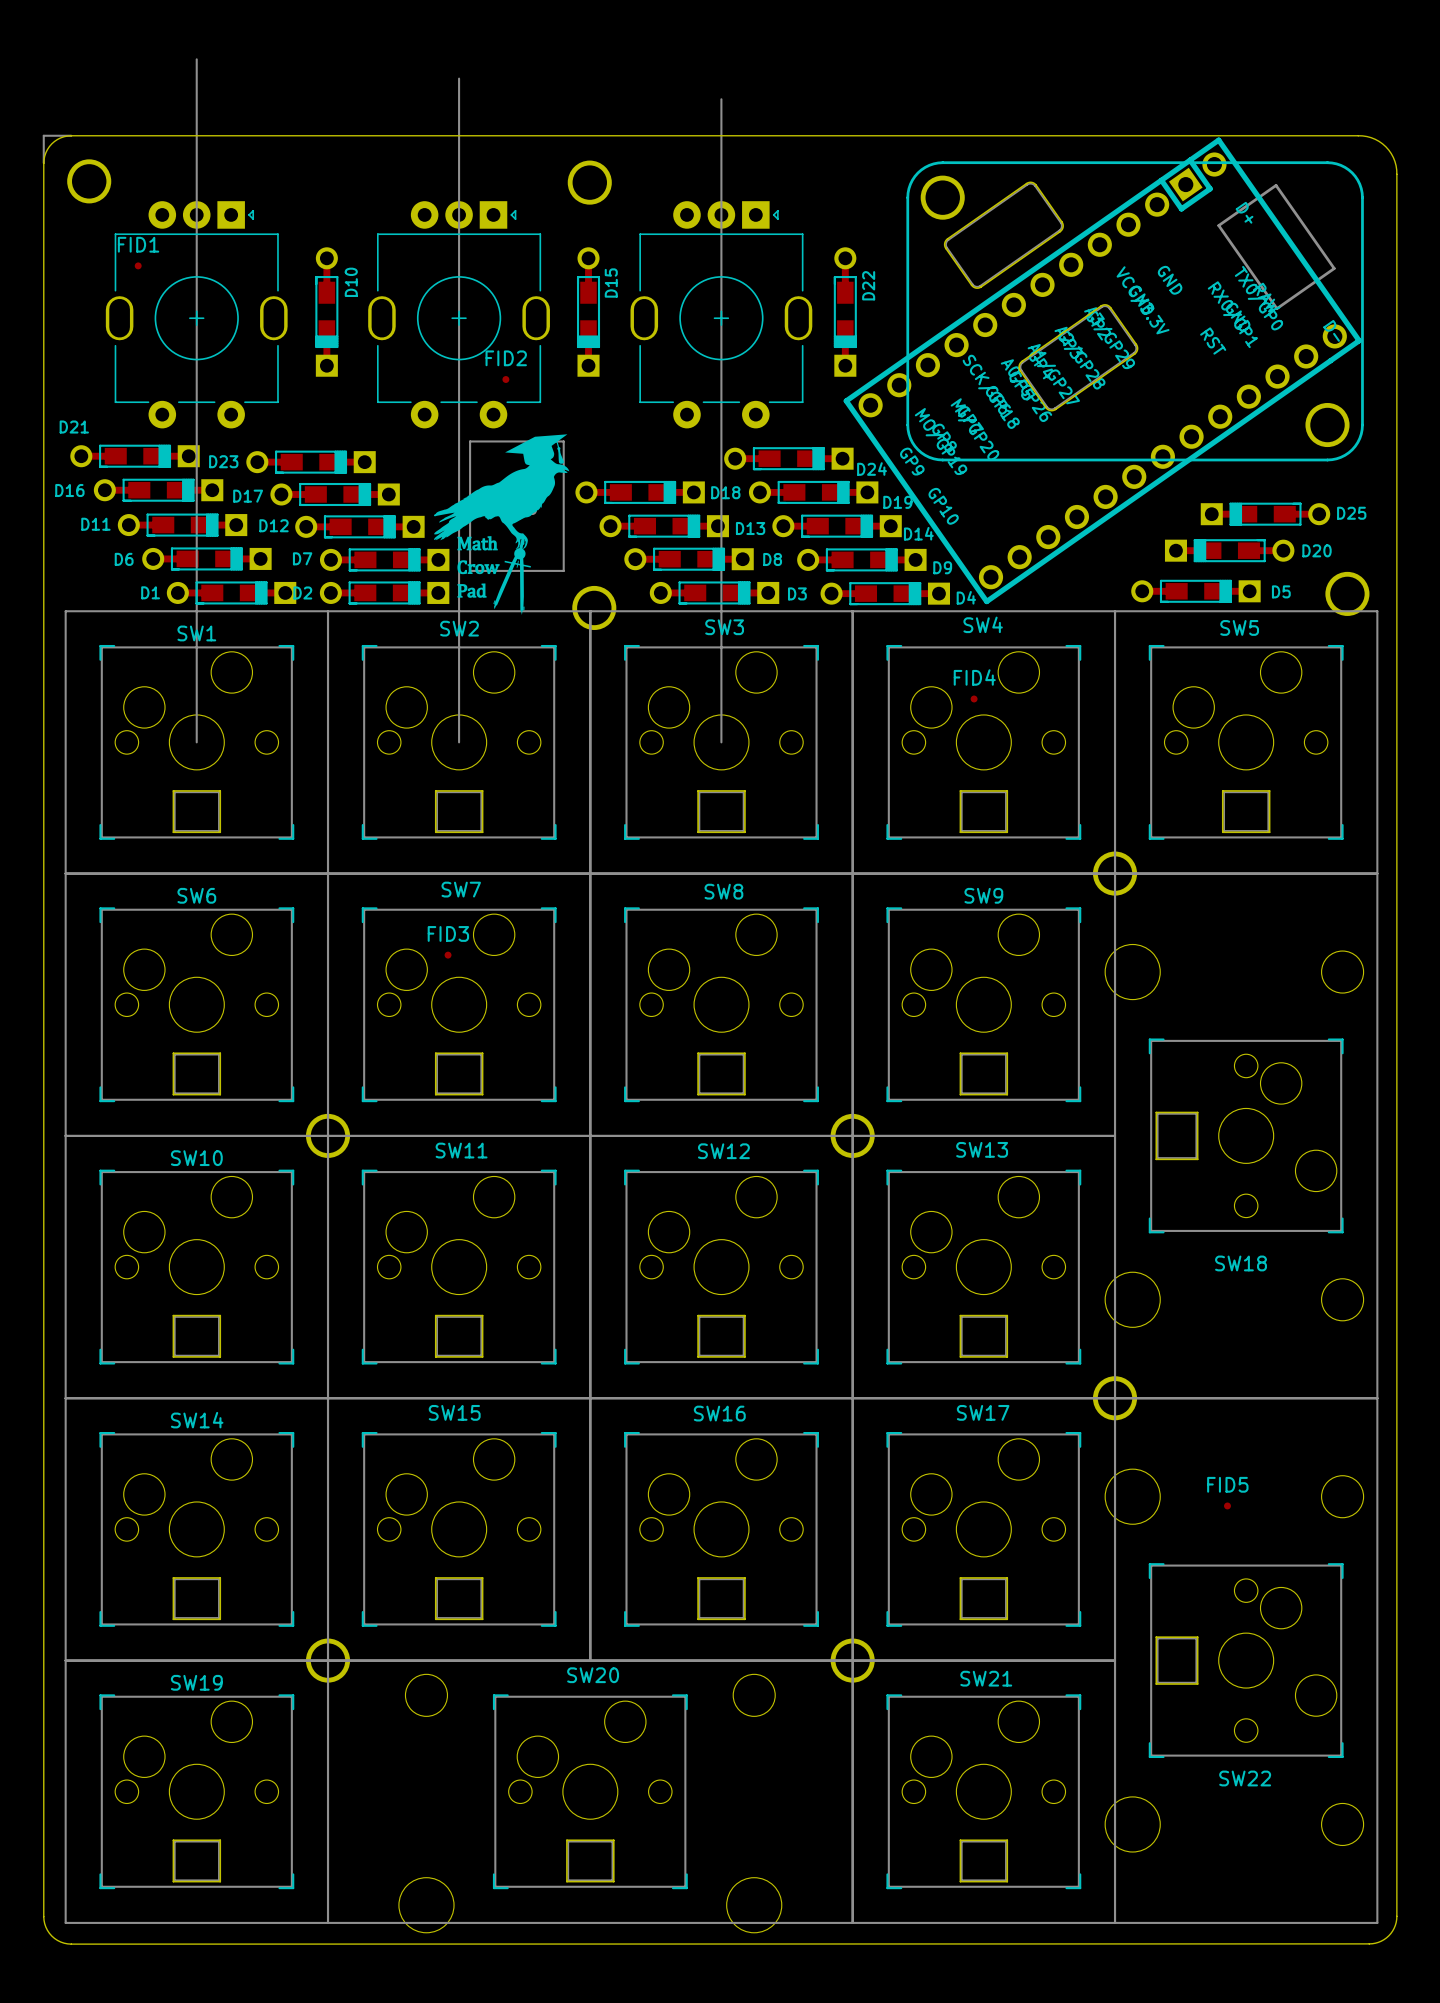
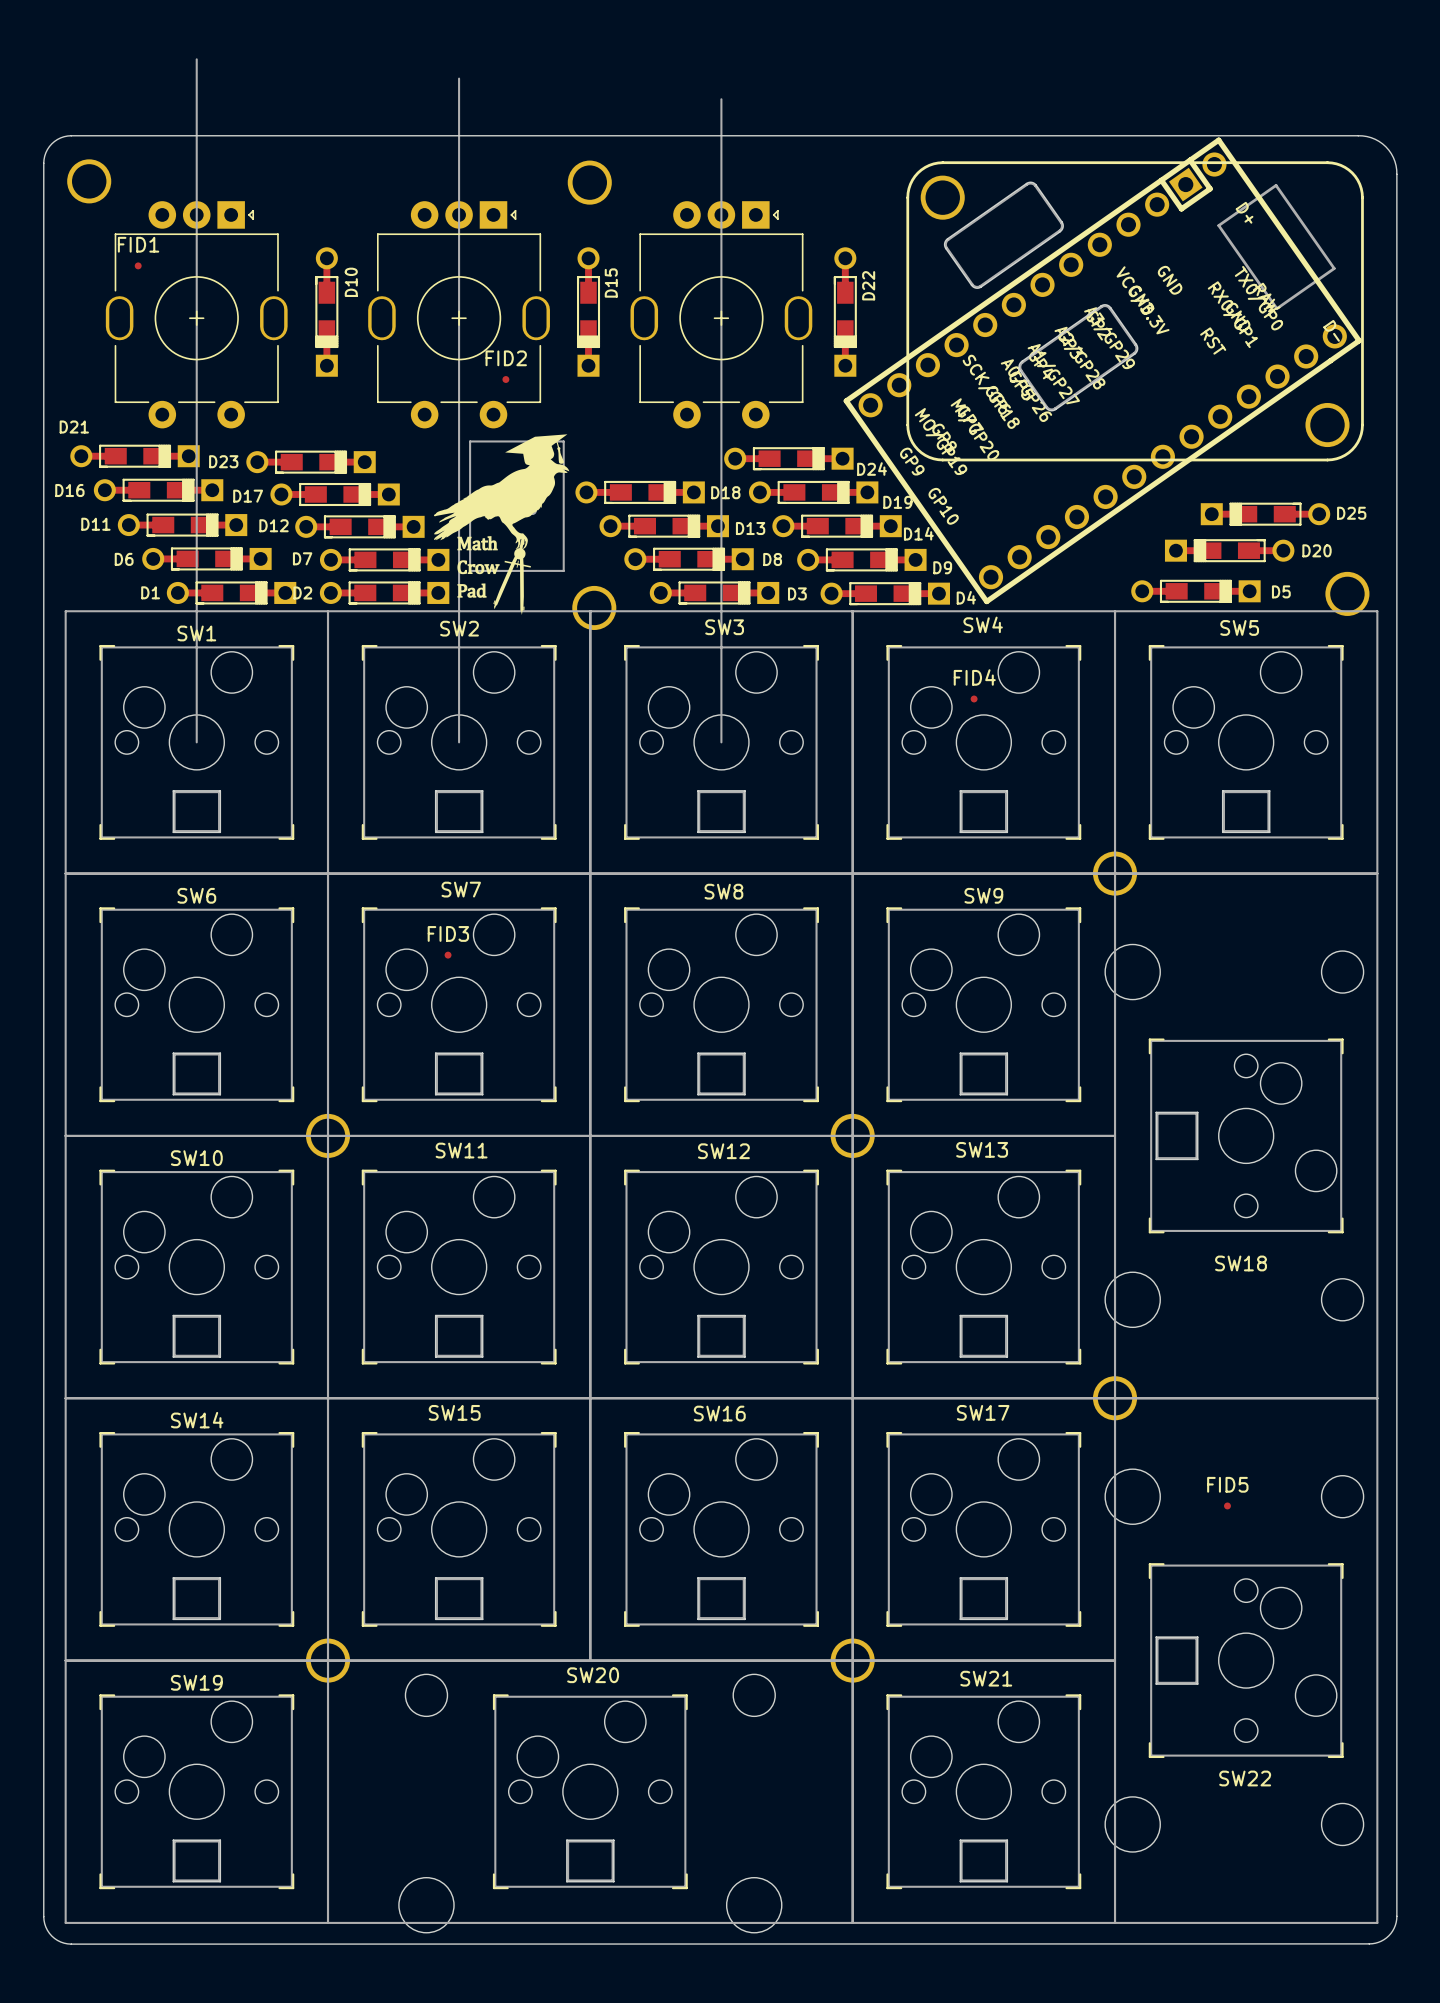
line: (71, 135) (43, 135) (43, 163) -> none

